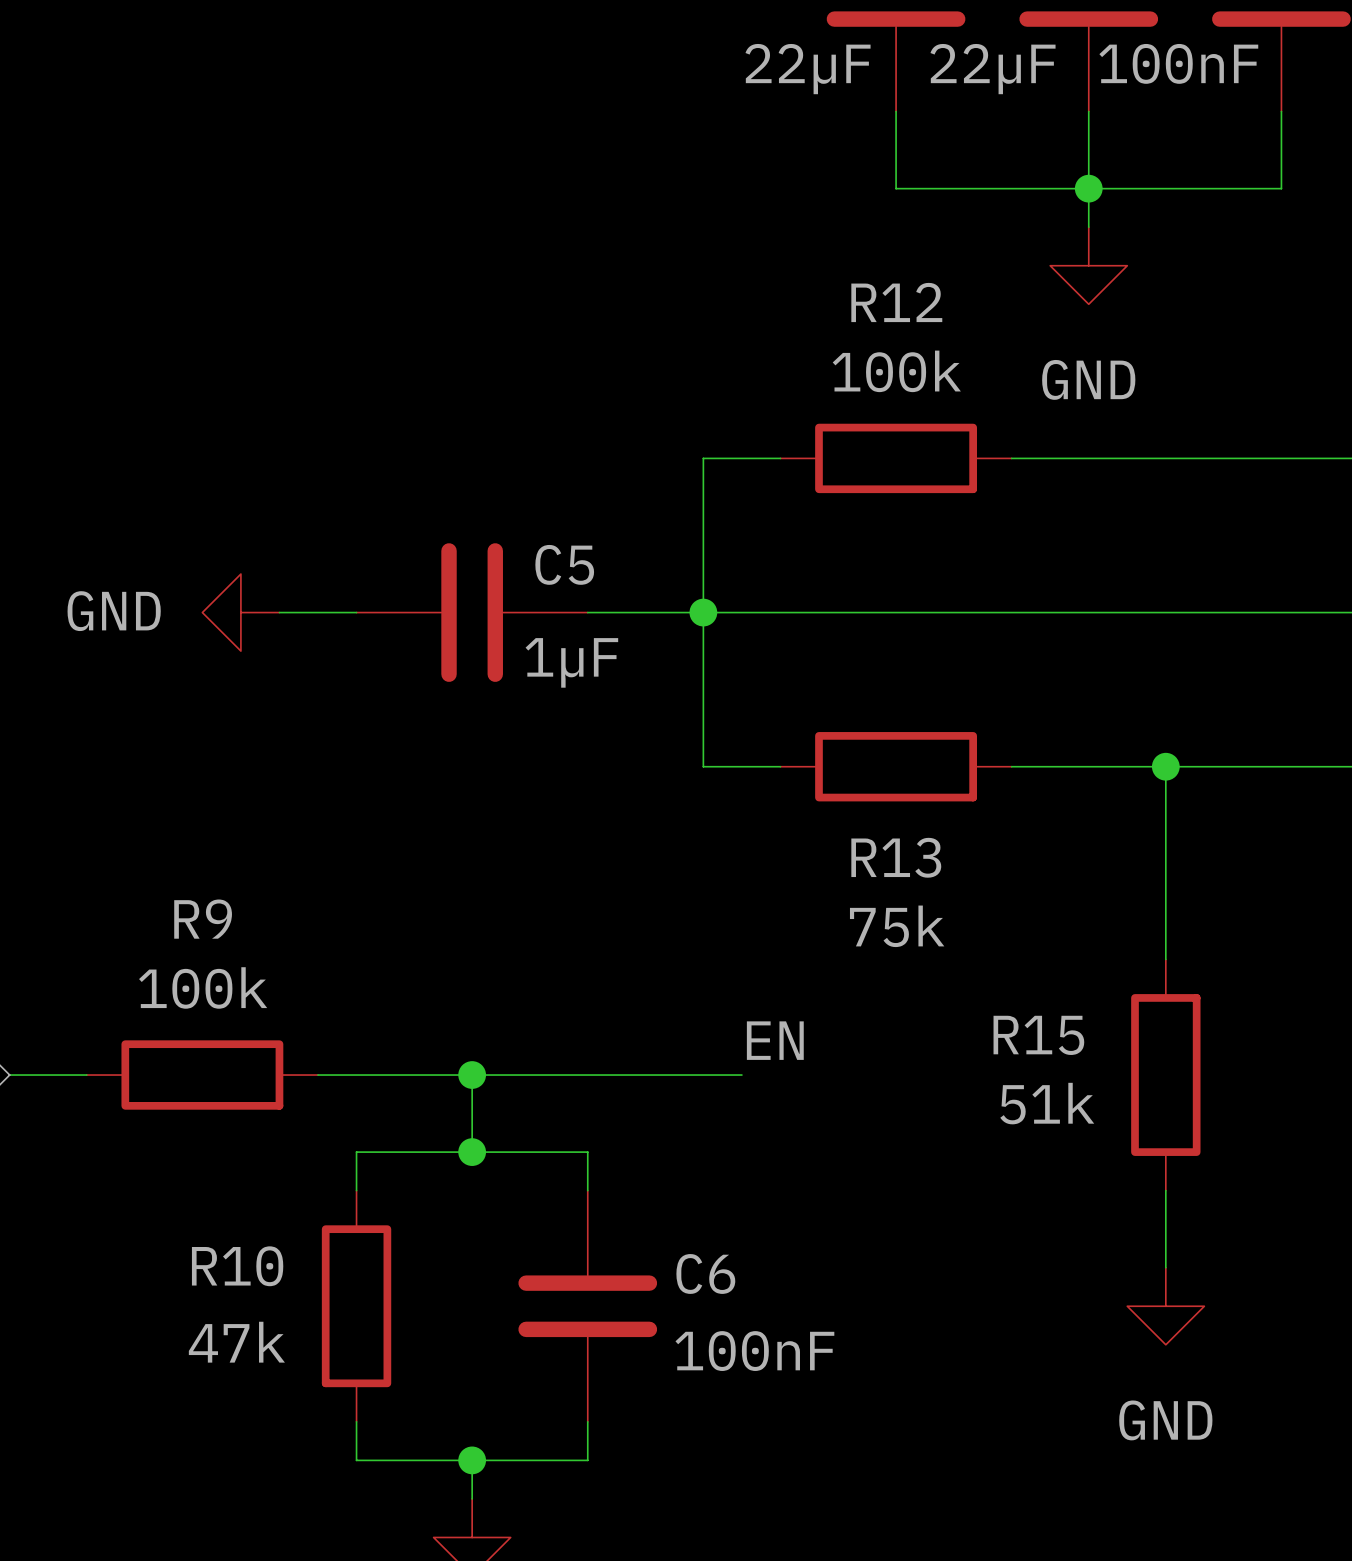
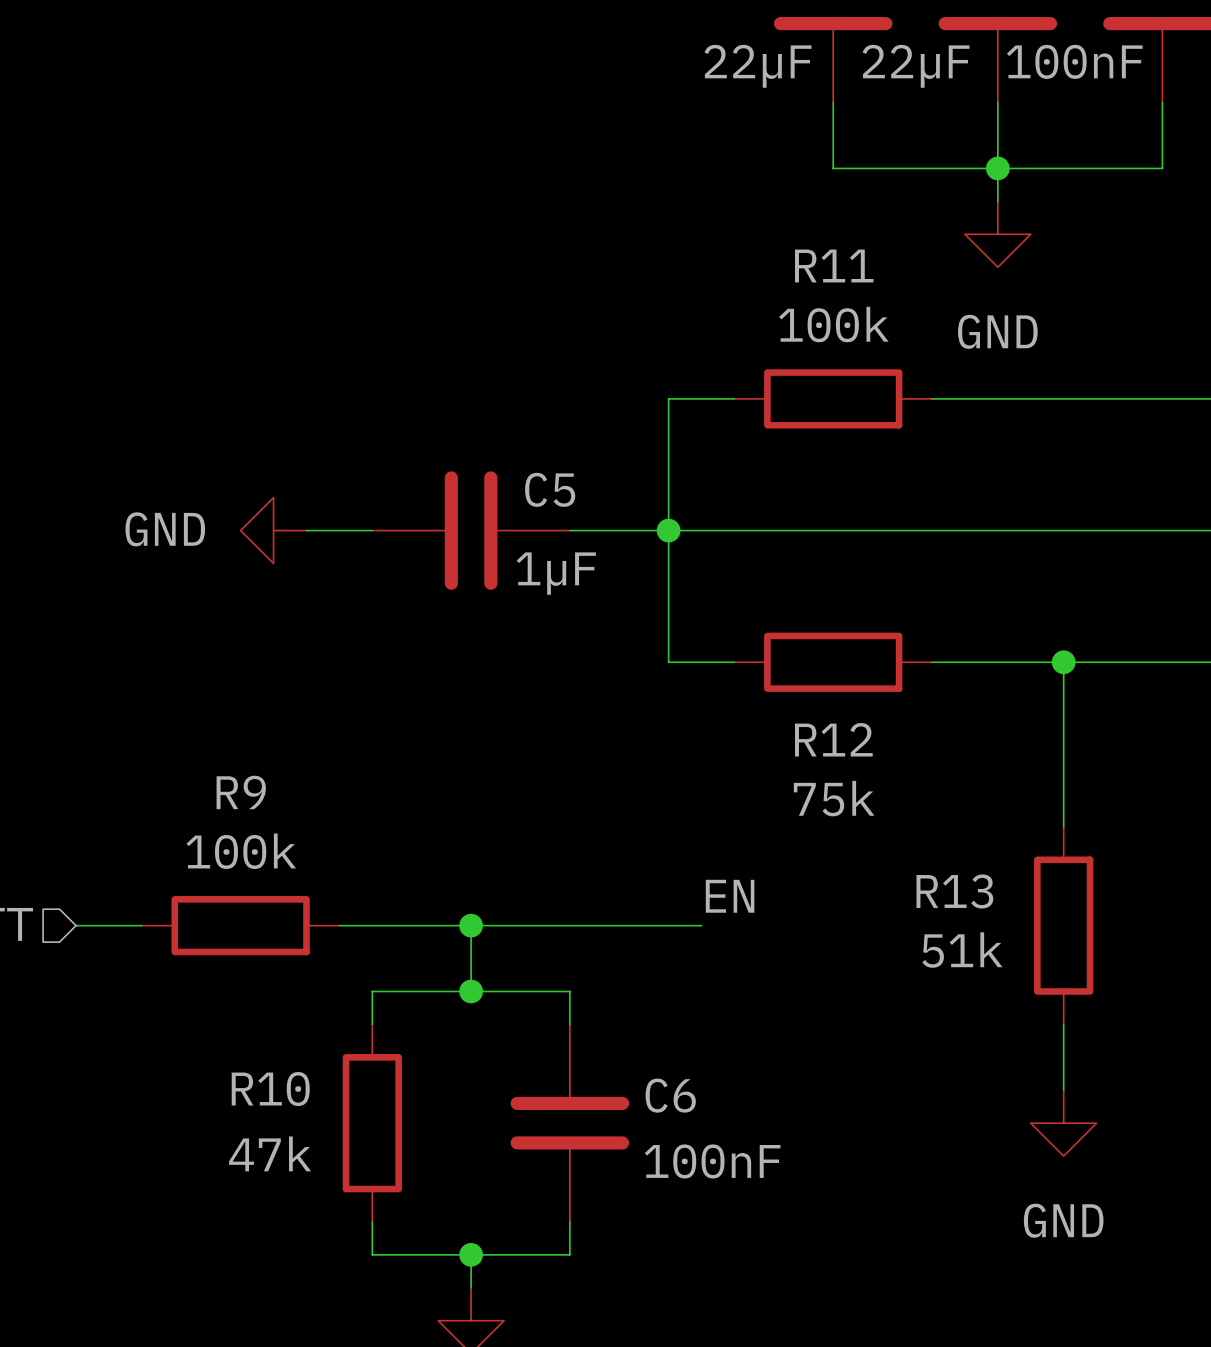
R12 name: R12 (896, 302) -> R11 (834, 265)
R13 name: R13 (896, 857) -> R12 (833, 739)
R15 name: R15 (1038, 1035) -> R13 (954, 891)

